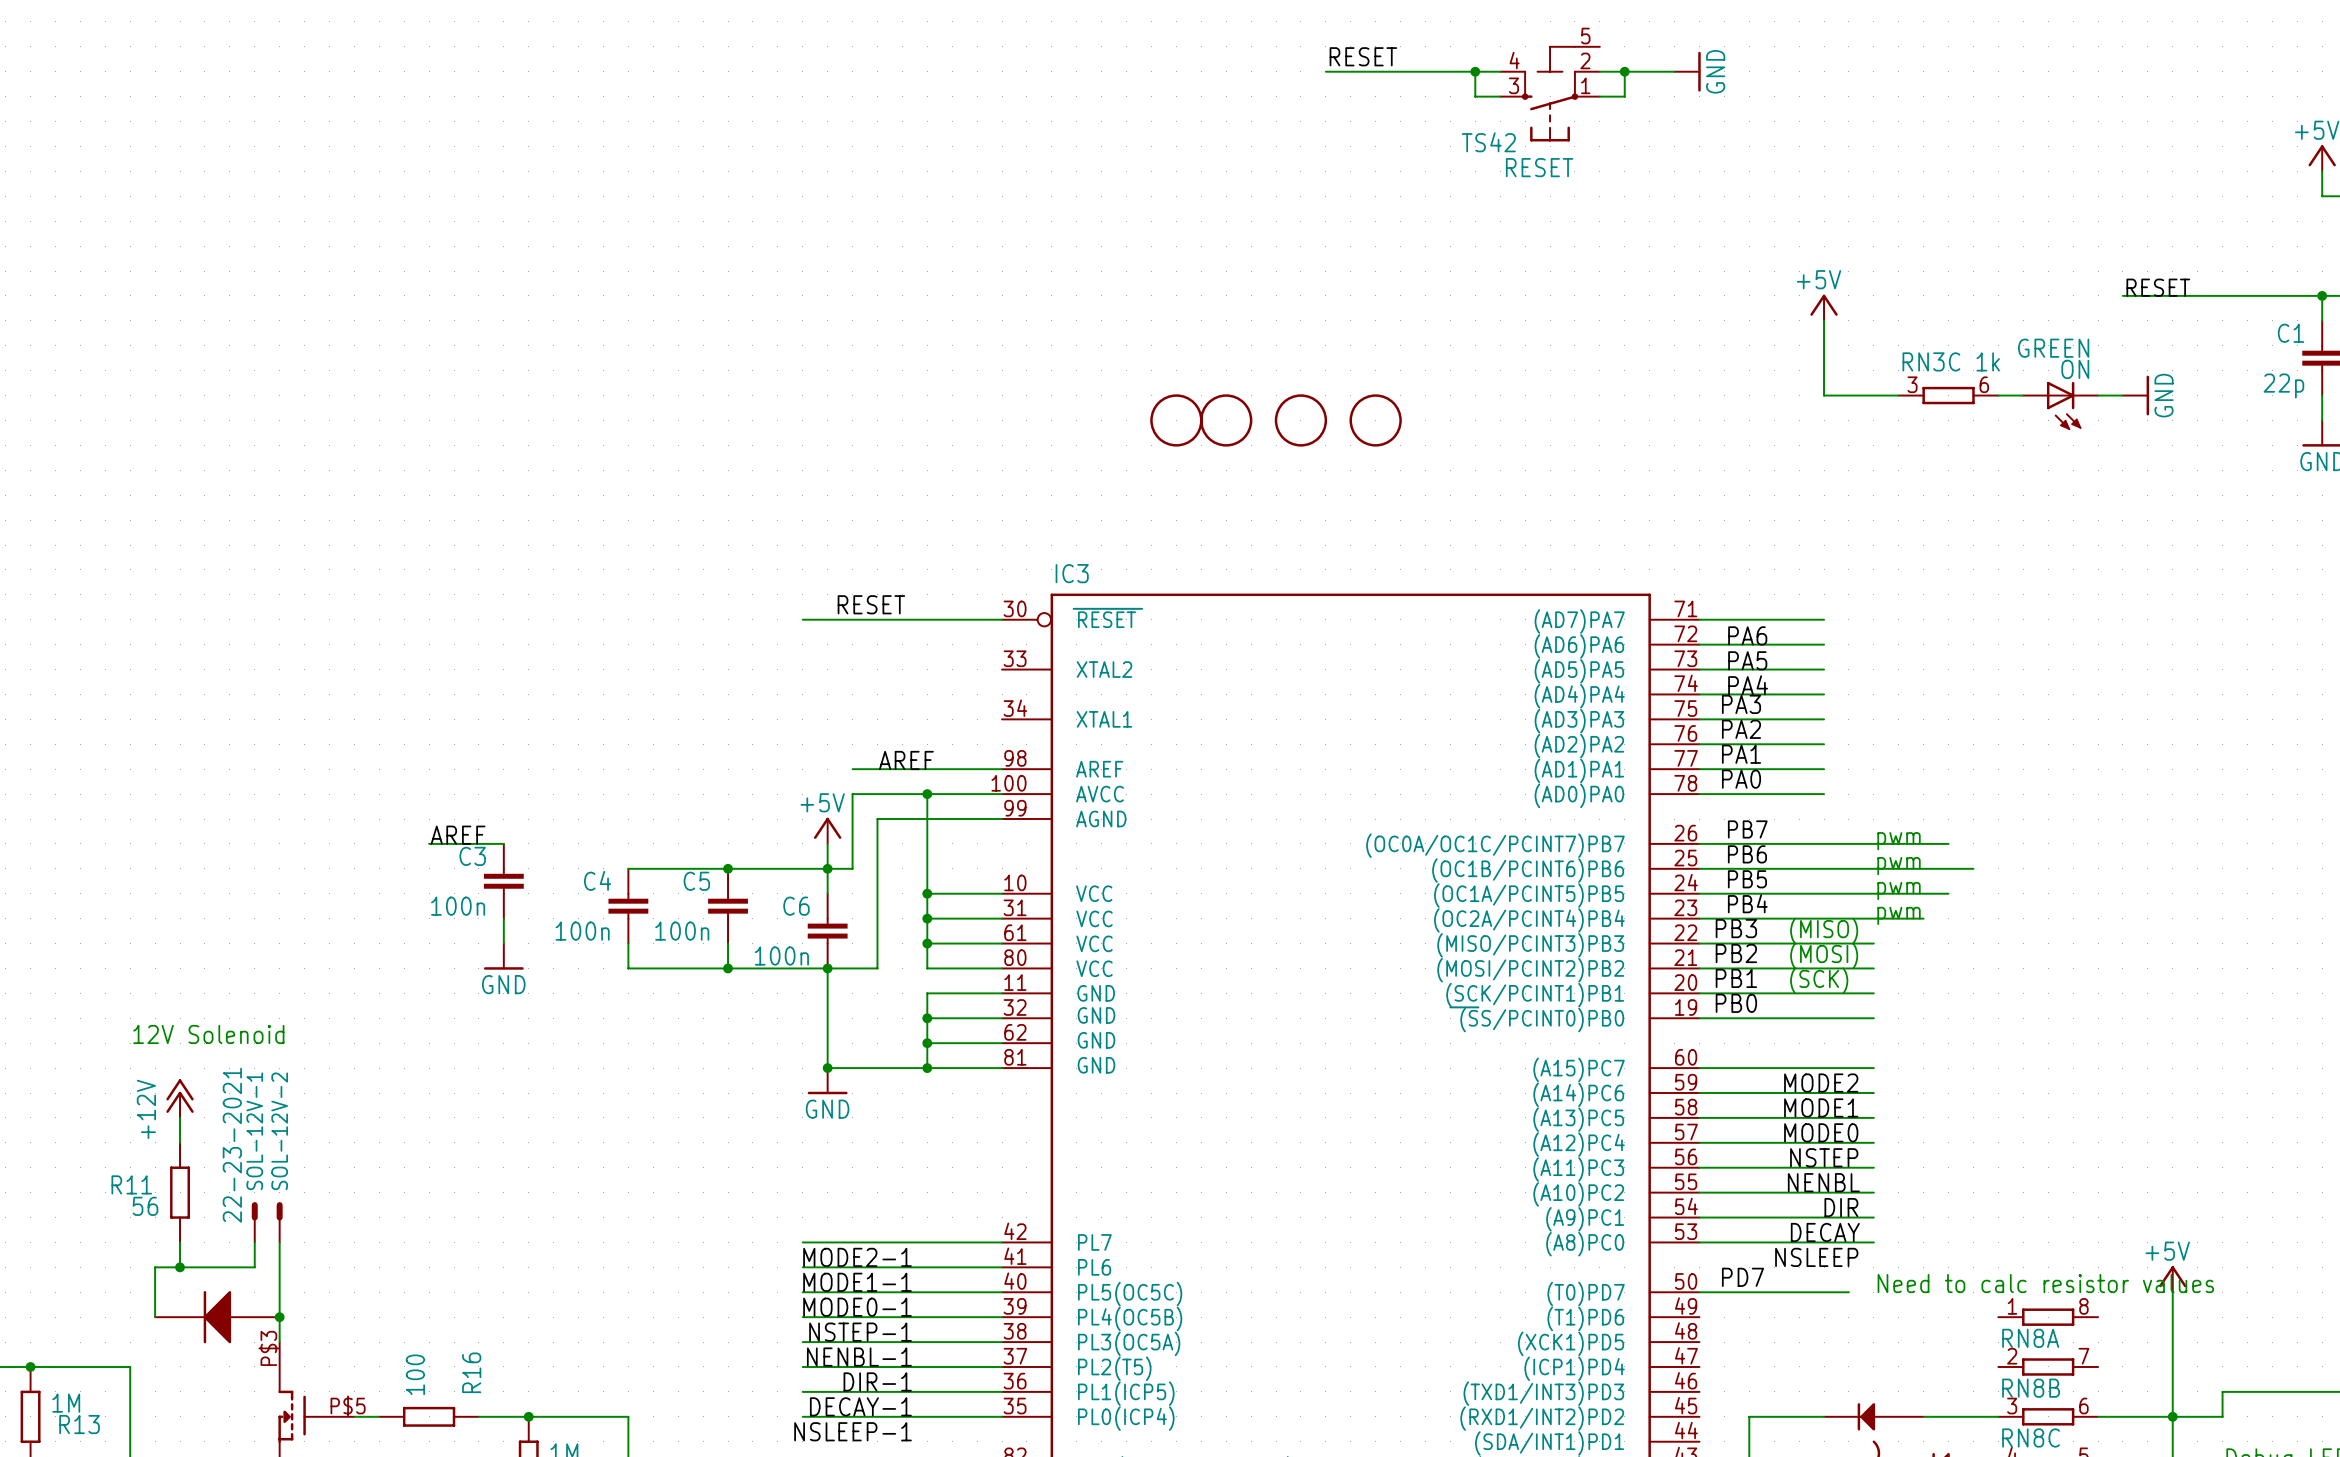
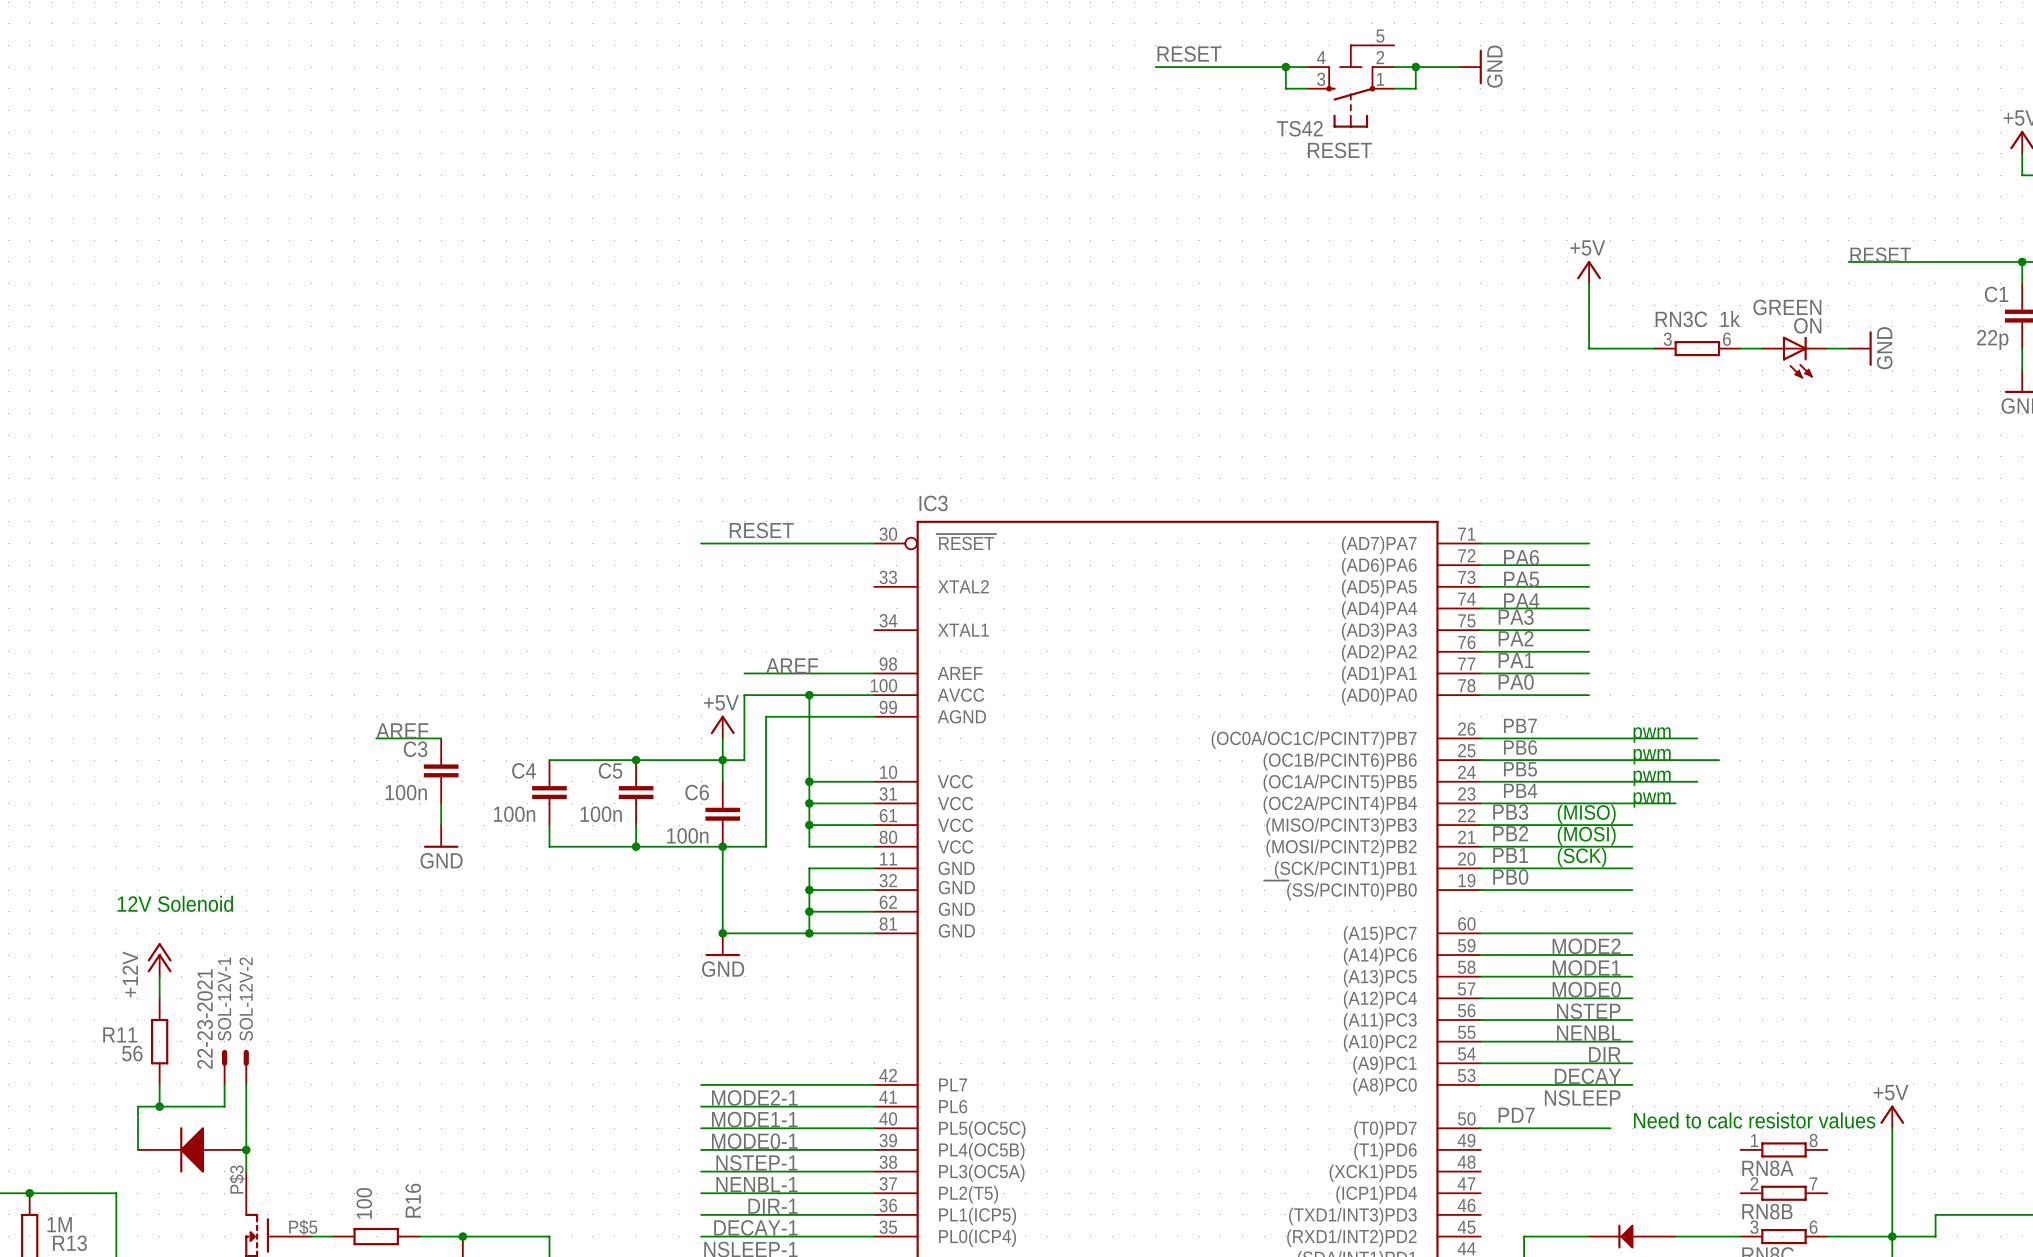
part: (1176, 420) -> none
part: (1226, 420) -> none
part: (1300, 420) -> none
part: (1375, 420) -> none

